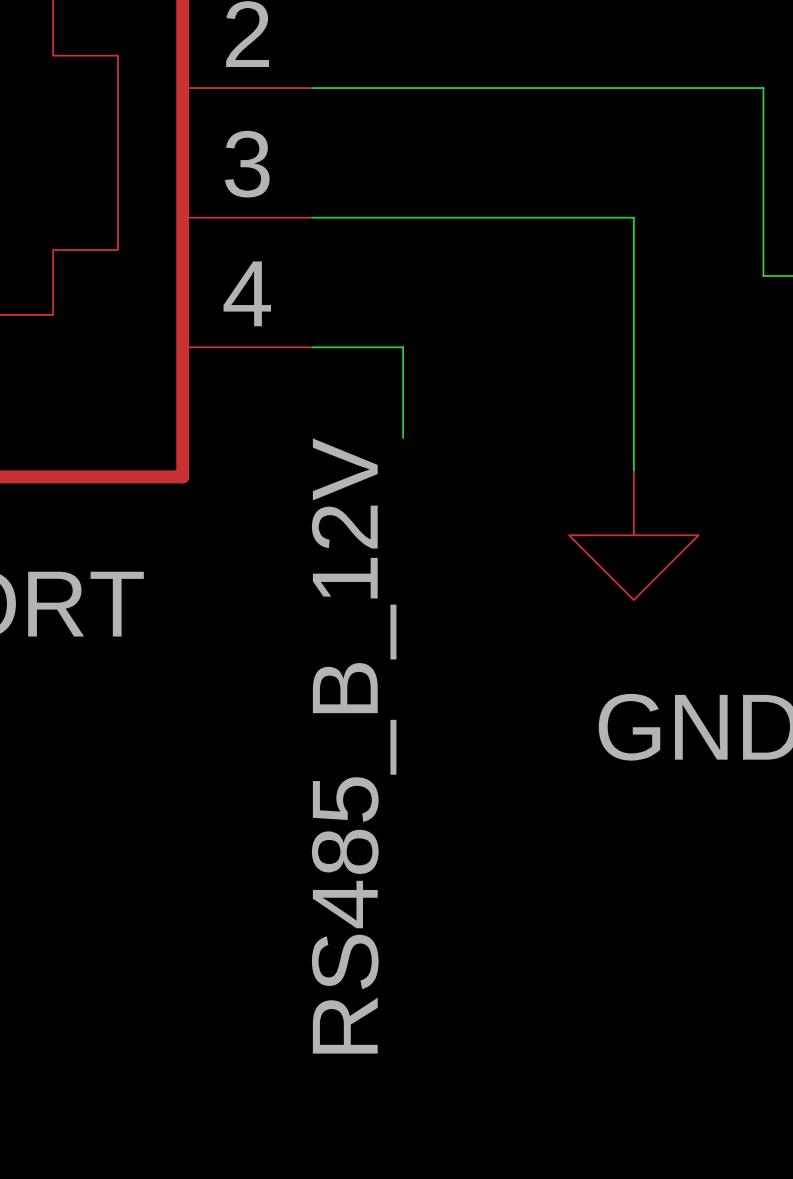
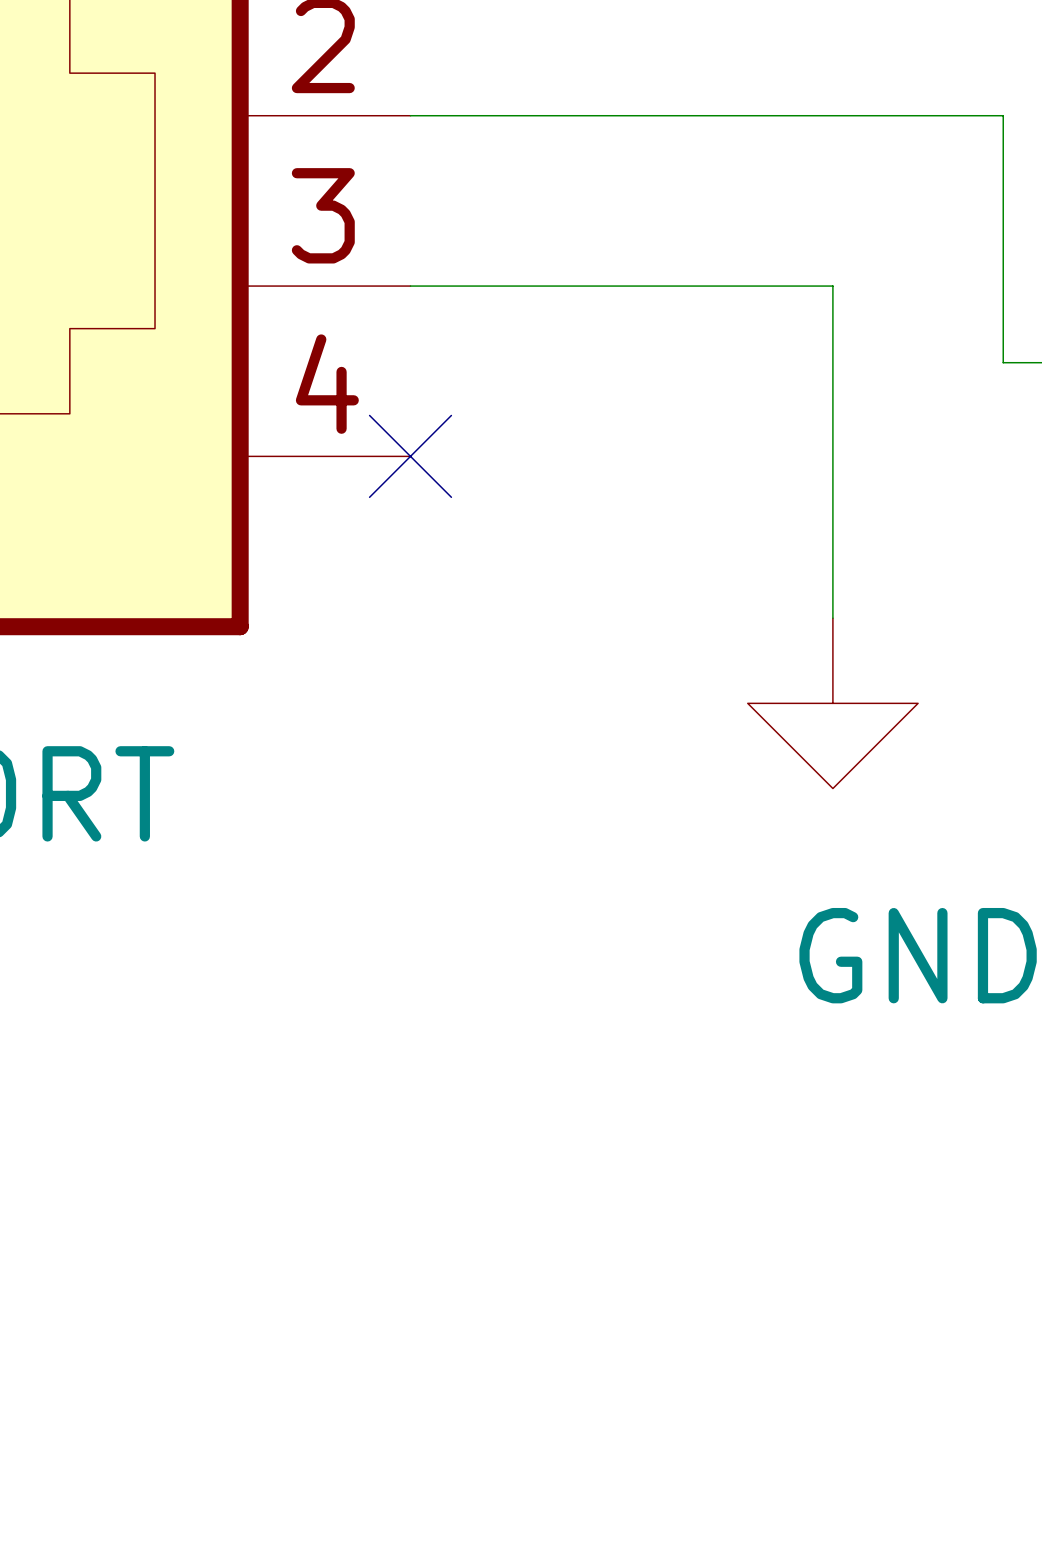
wire: (312, 347) (403, 347) (403, 438) -> none
no-connect mark: none -> (410, 456)
label: RS485_B_12V (354, 746) -> none

